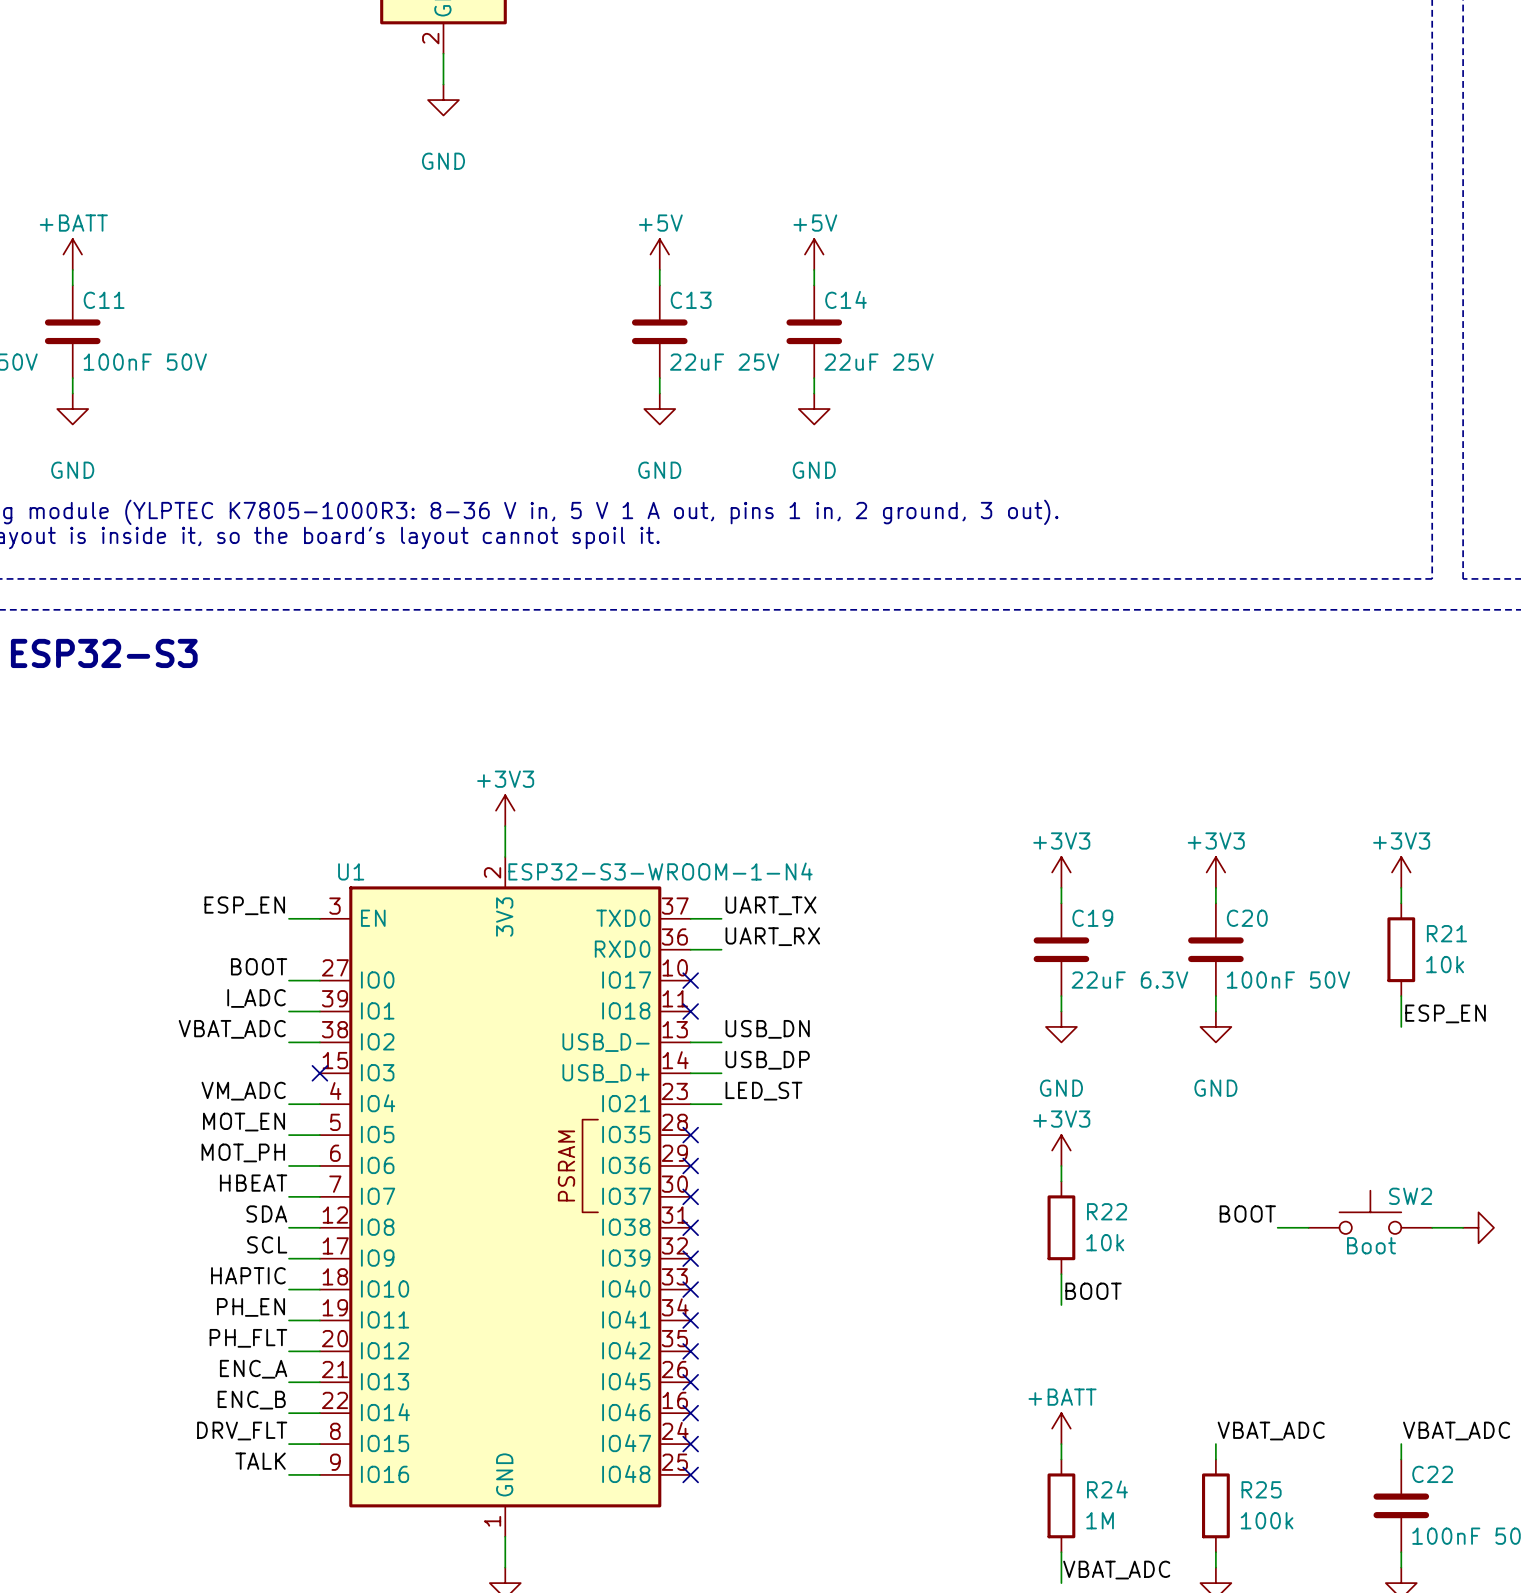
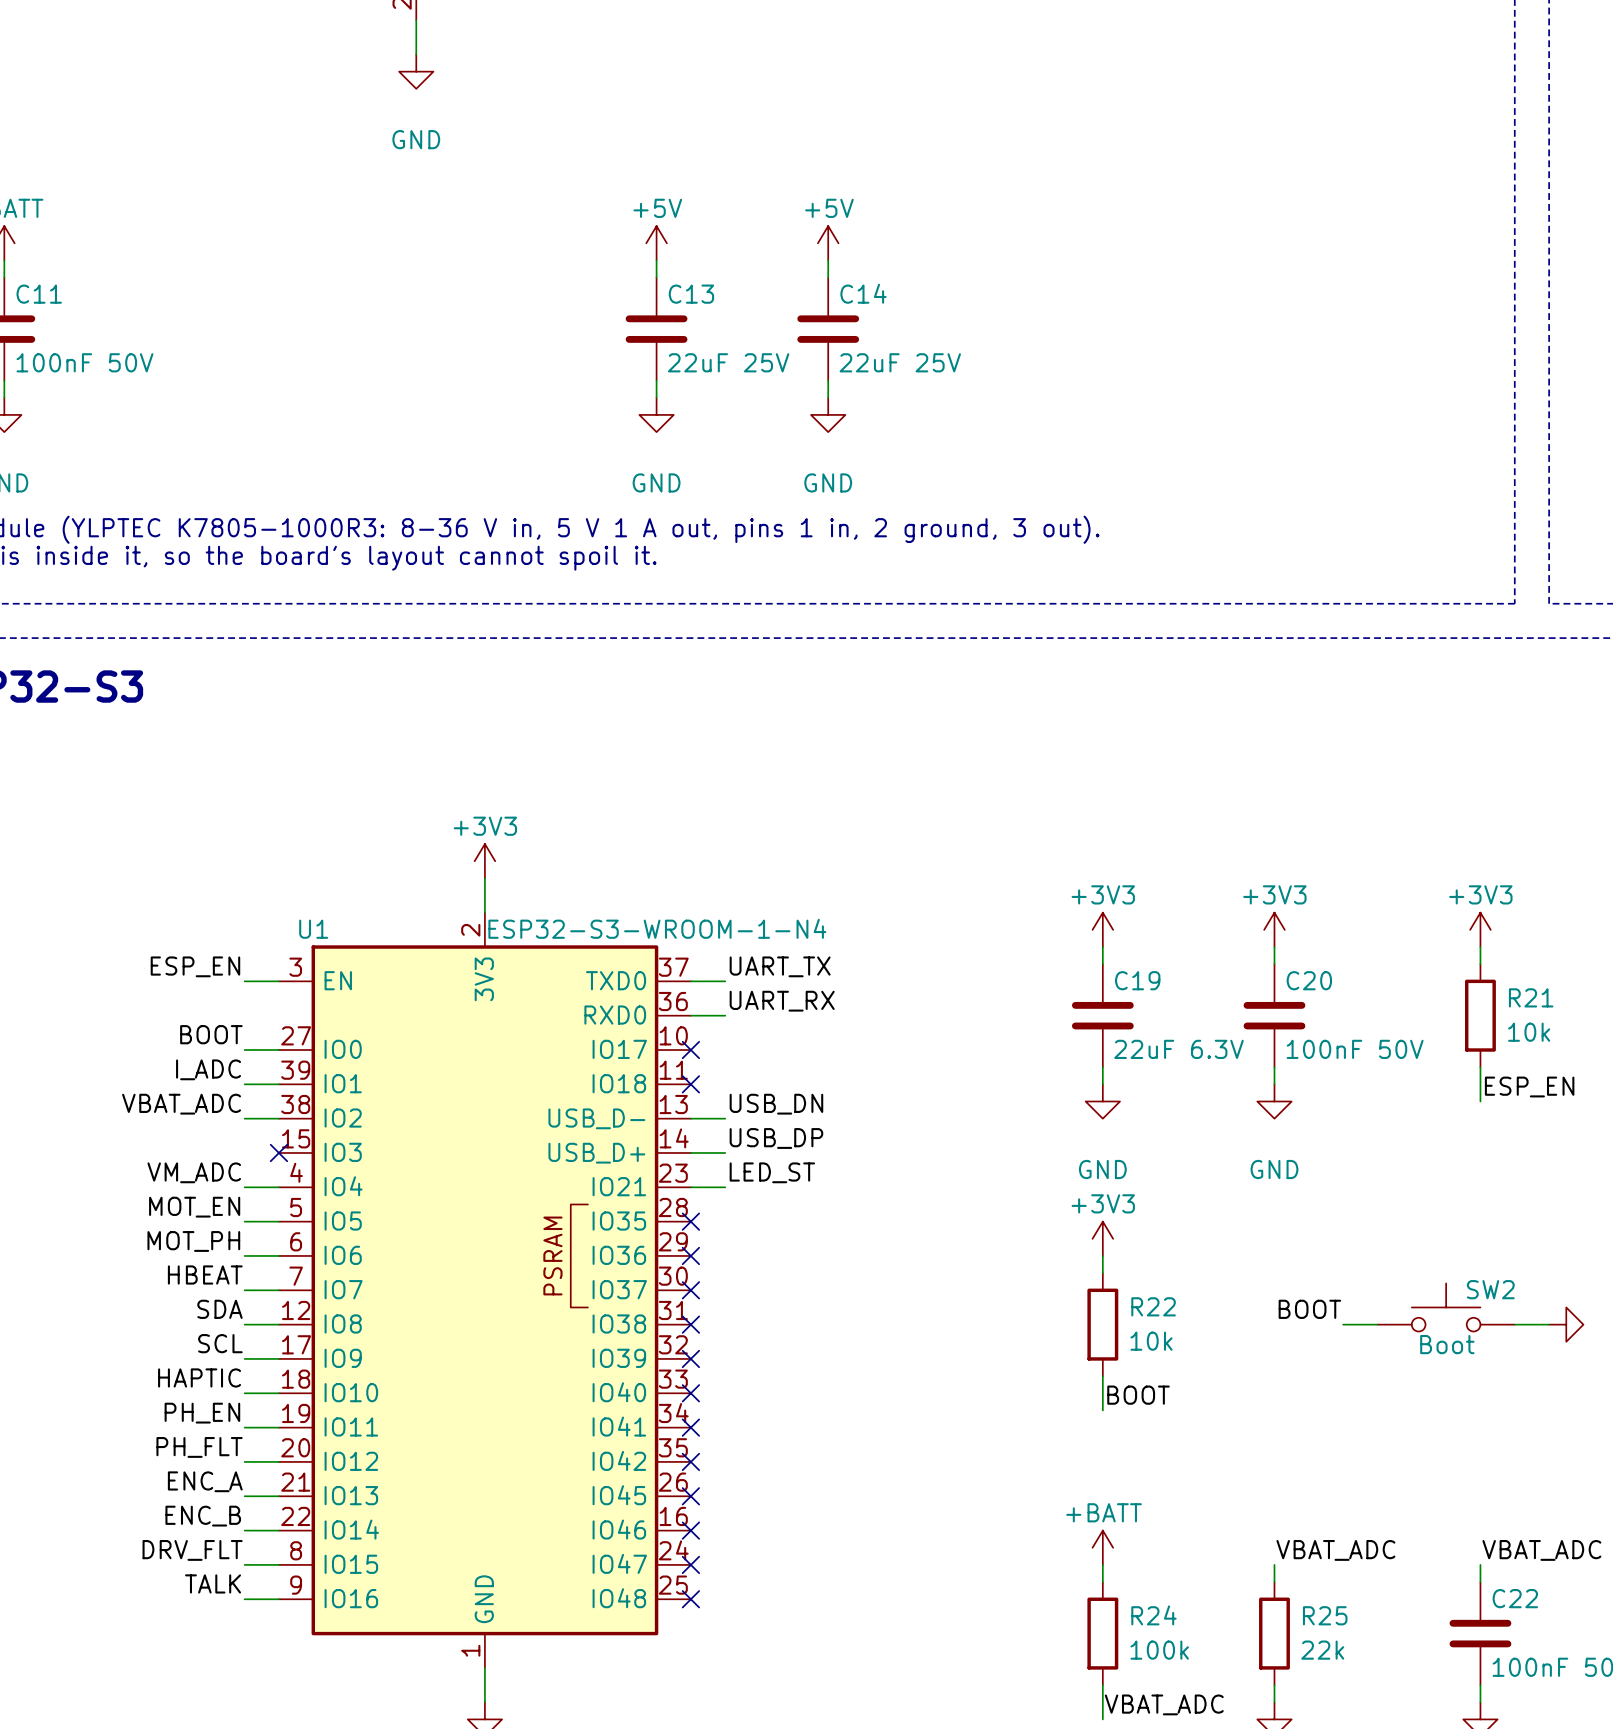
R24 value: 1M (1100, 1520) -> 100k (1159, 1650)
R25 value: 100k (1267, 1520) -> 22k (1322, 1650)

